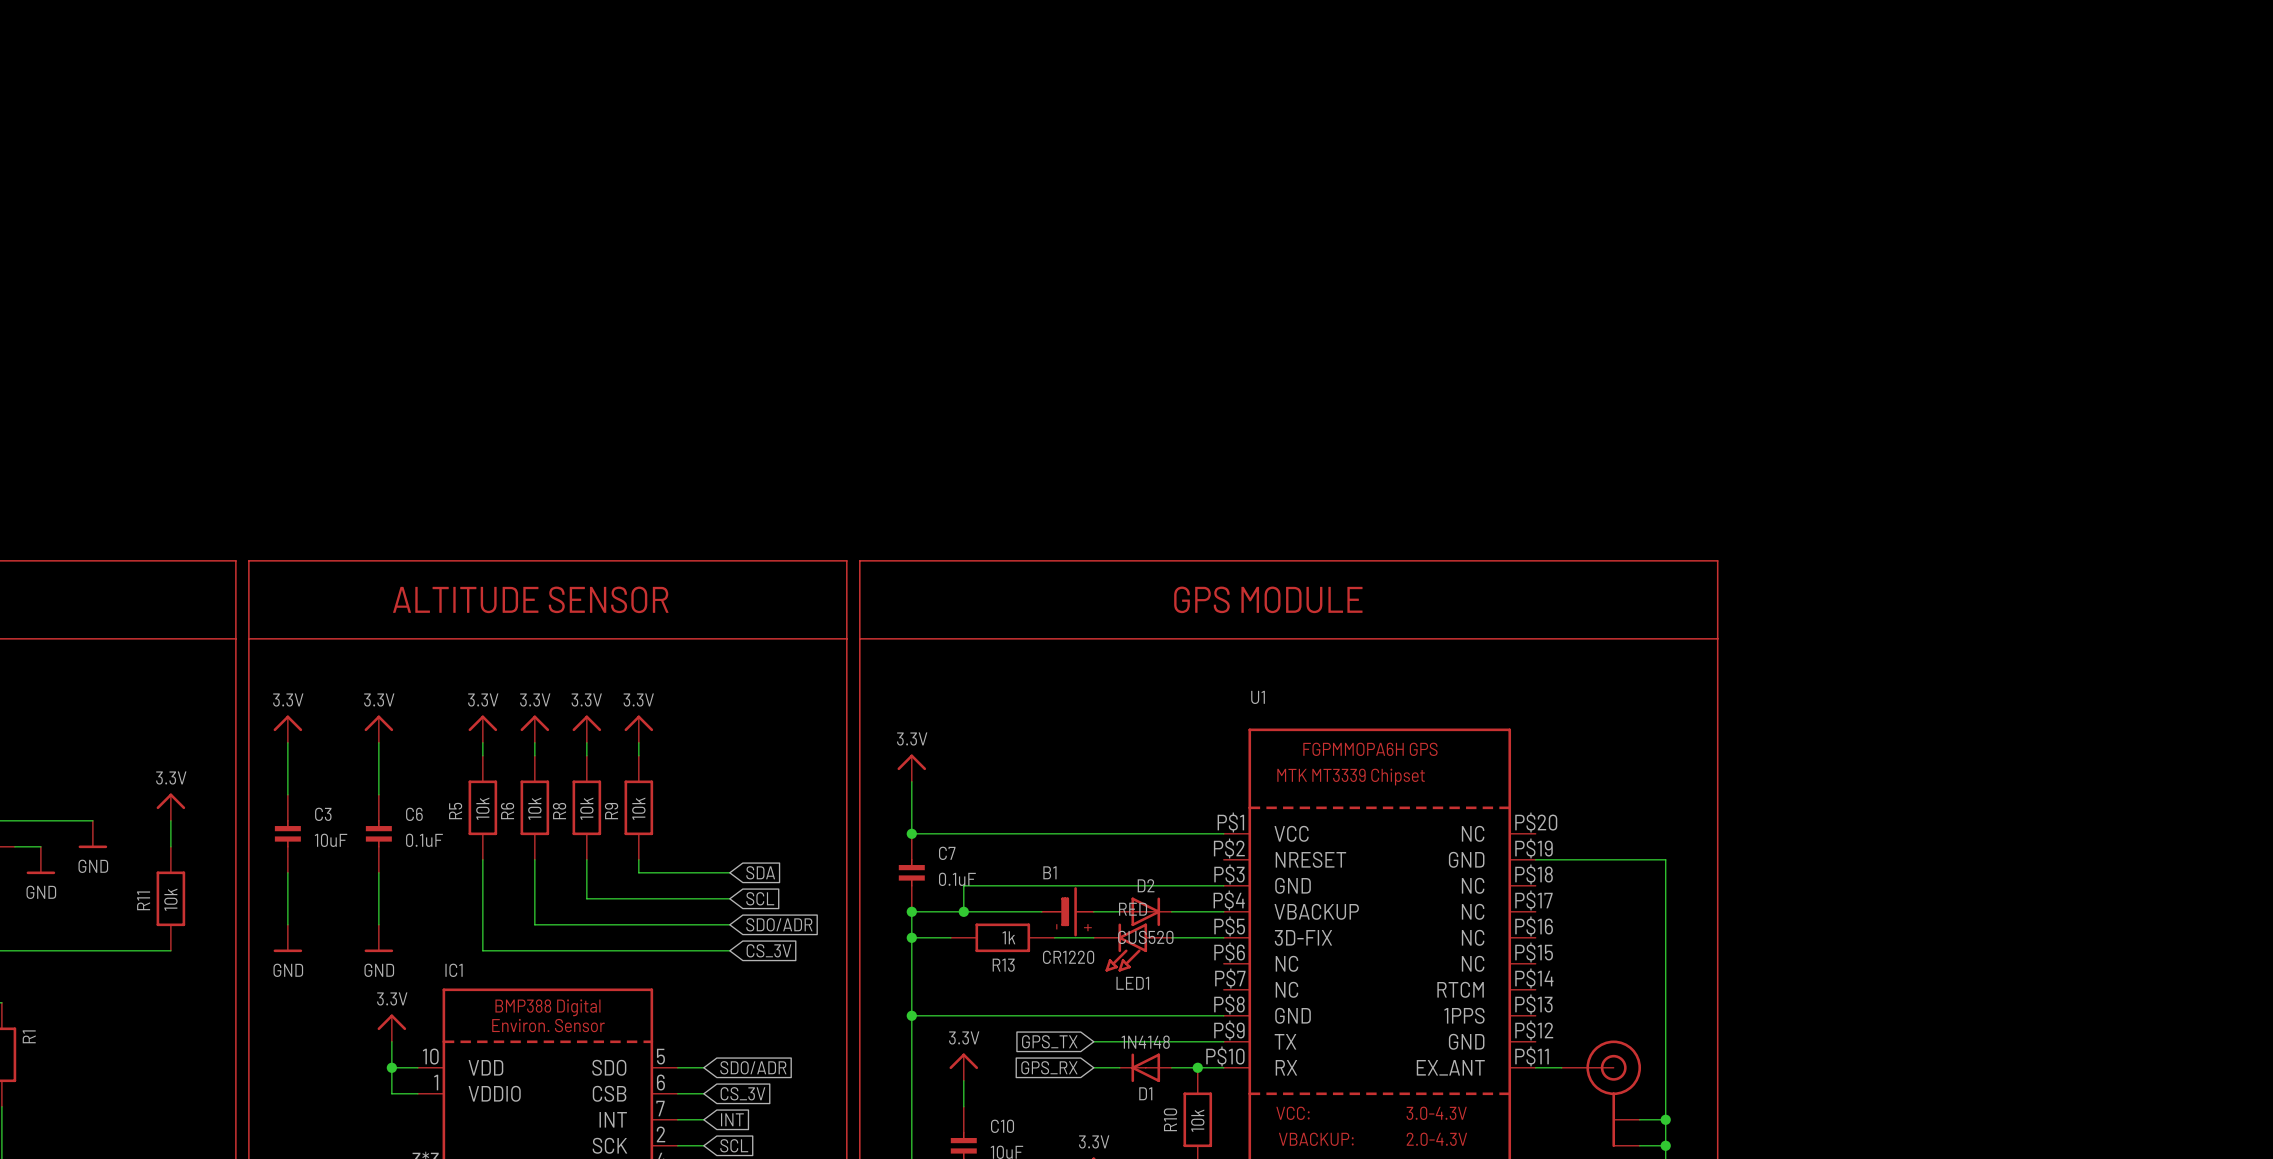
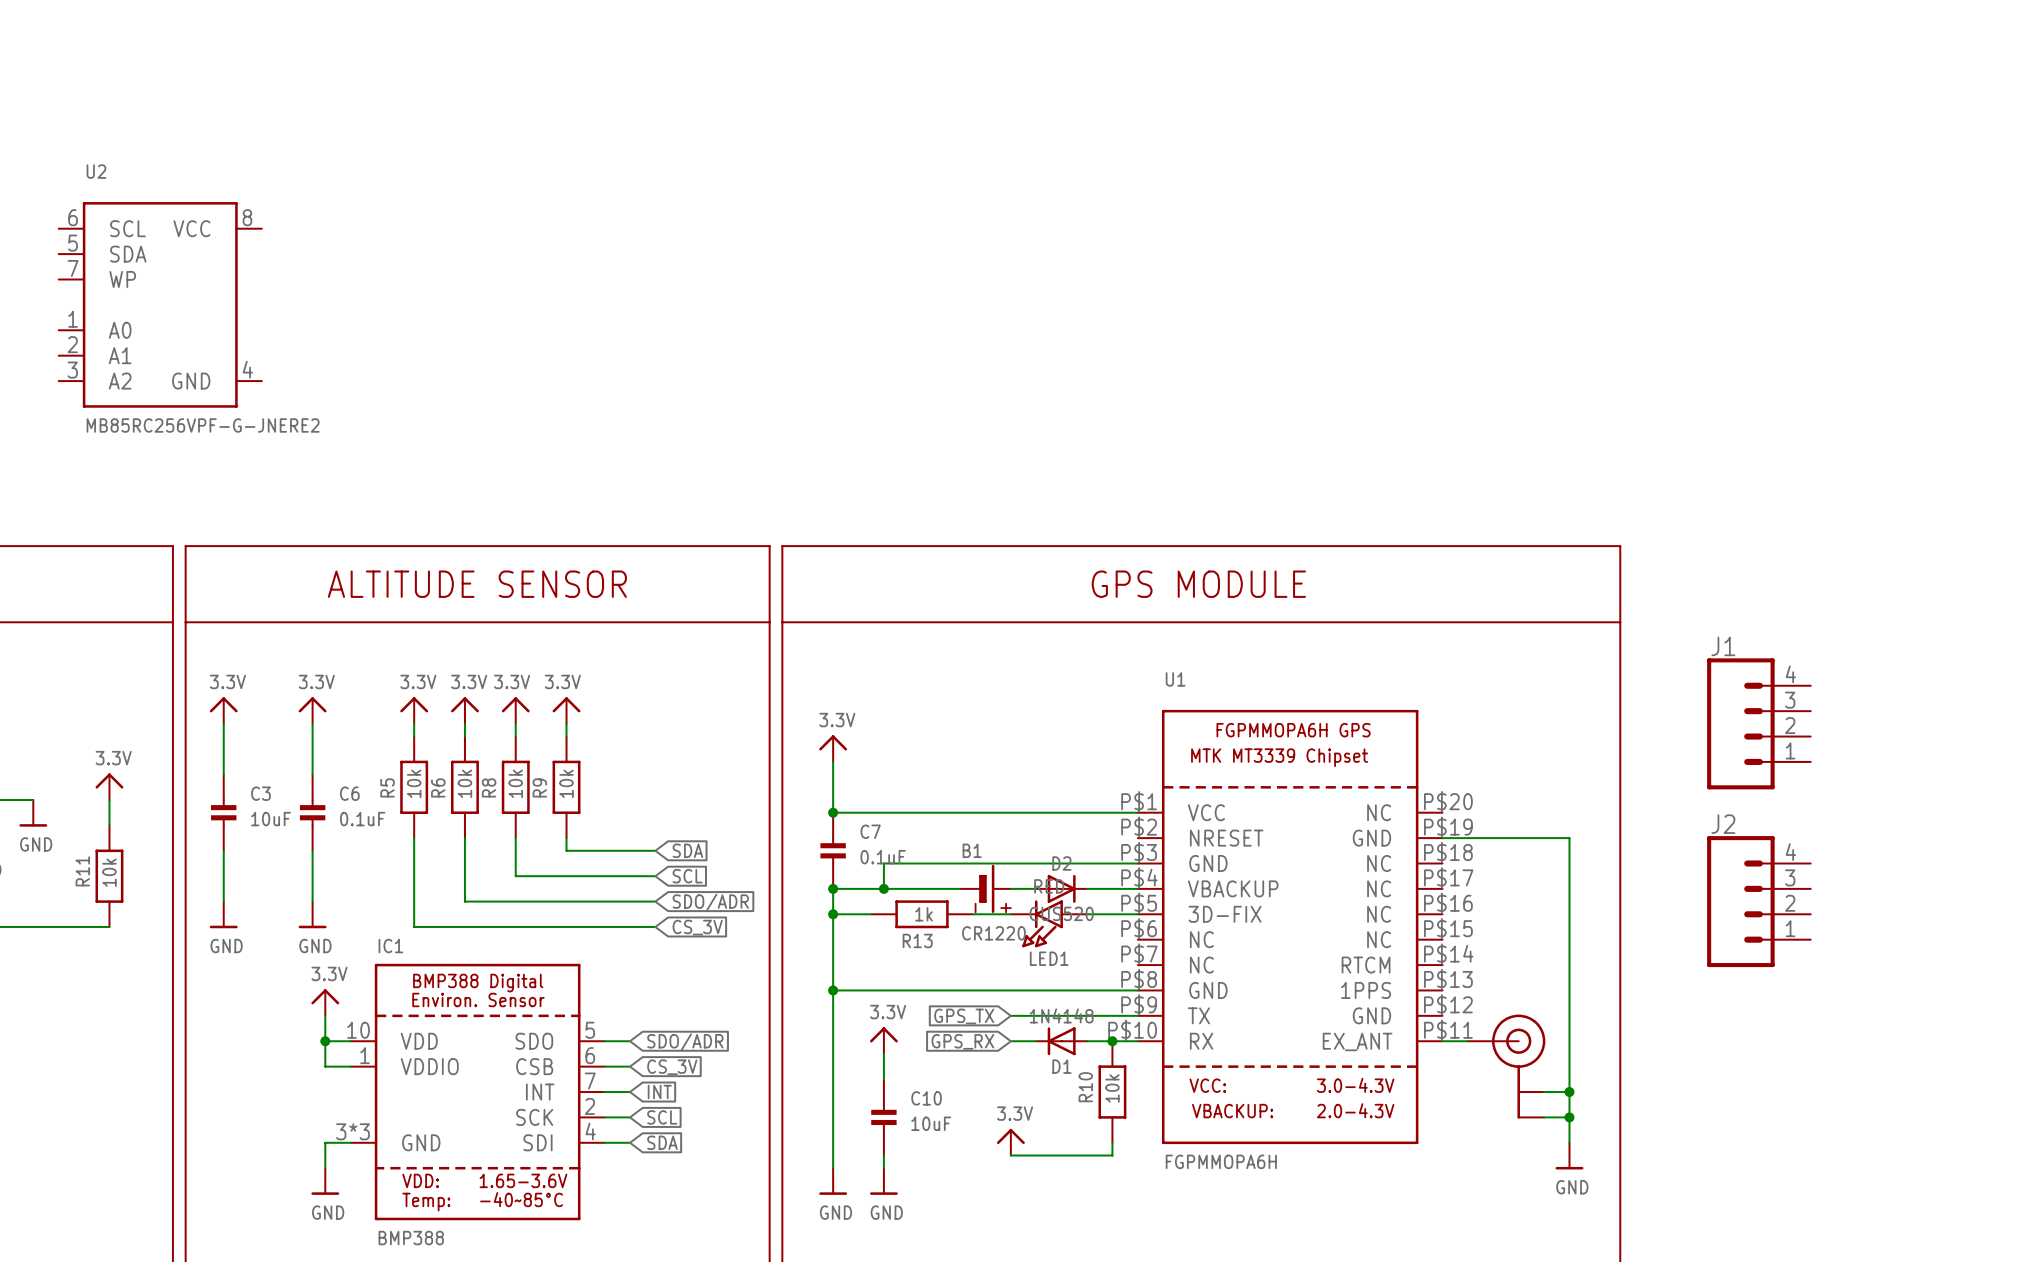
U2: none -> MB85RC256VPF-G-JNERE2 (160, 304)
J1: none -> (1758, 723)
J2: none -> (1758, 901)

